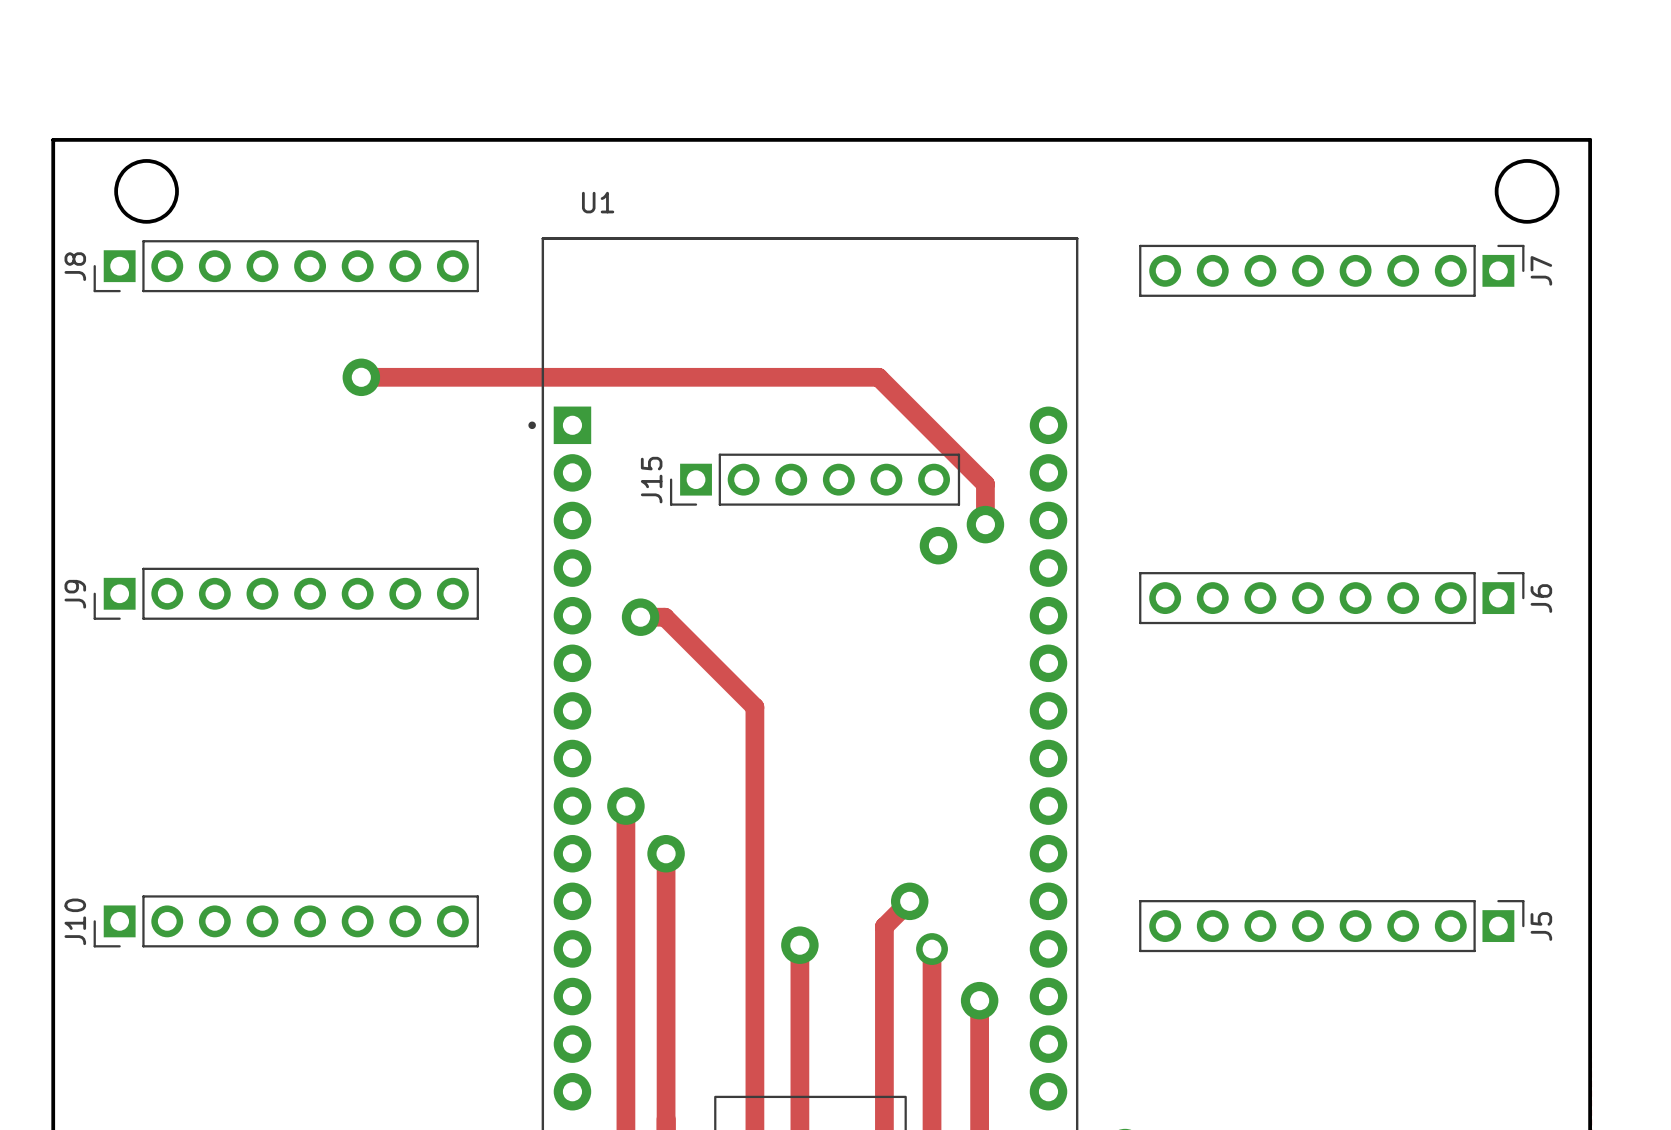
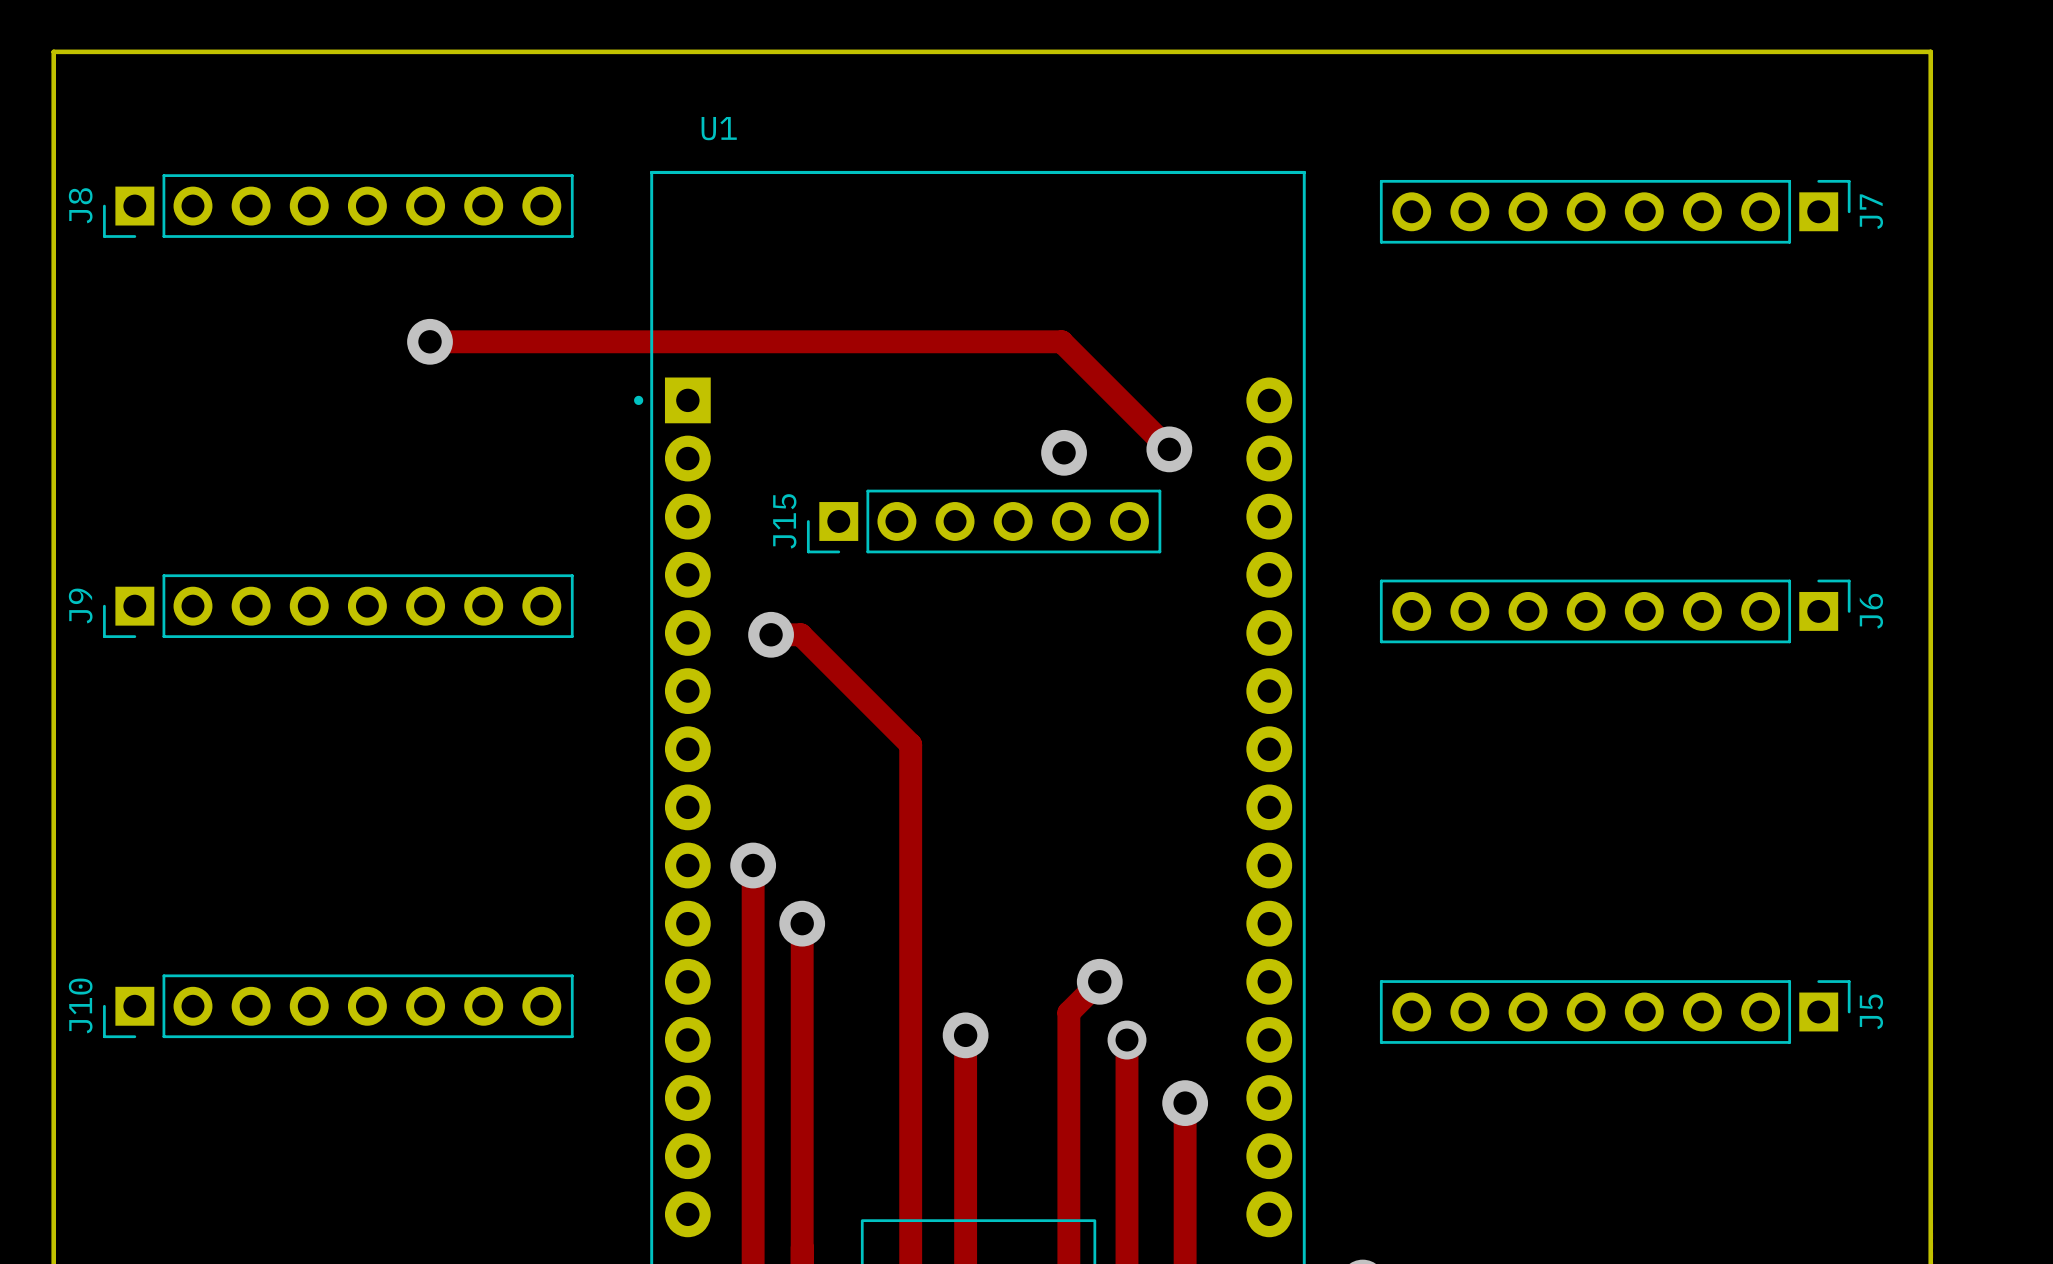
round board edge: [114, 159, 179, 224] -> none
round board edge: [1494, 159, 1560, 224] -> none
track: (966, 465) (985, 484) (985, 524) -> none
via: none -> (1169, 449)
via: none -> (1064, 452)
J15 position: (815, 479) -> (984, 521)
via: (985, 524) -> none
via: (938, 545) -> none

